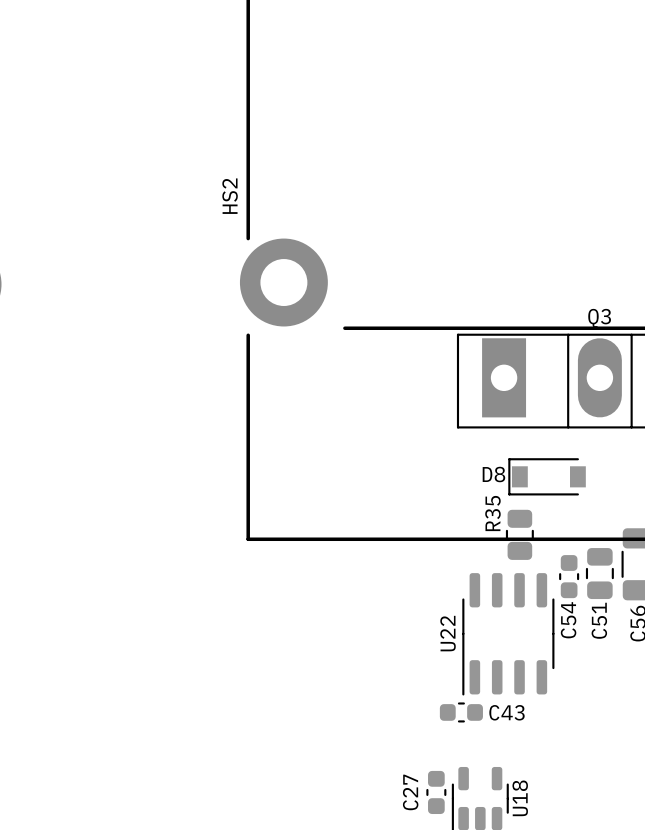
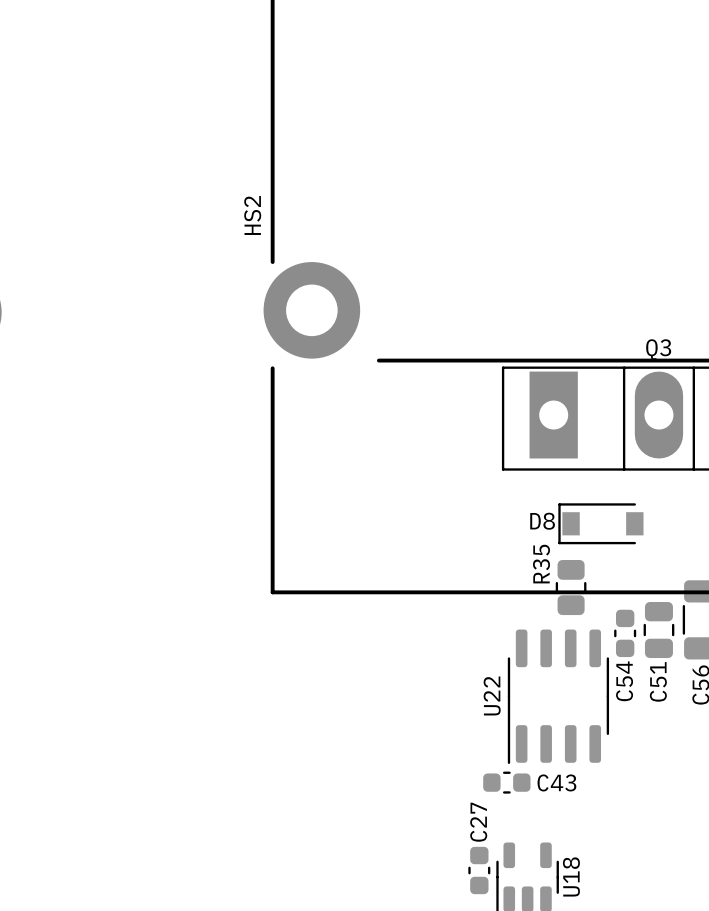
C27 name position: C27 (410, 792) -> C27 (478, 822)

